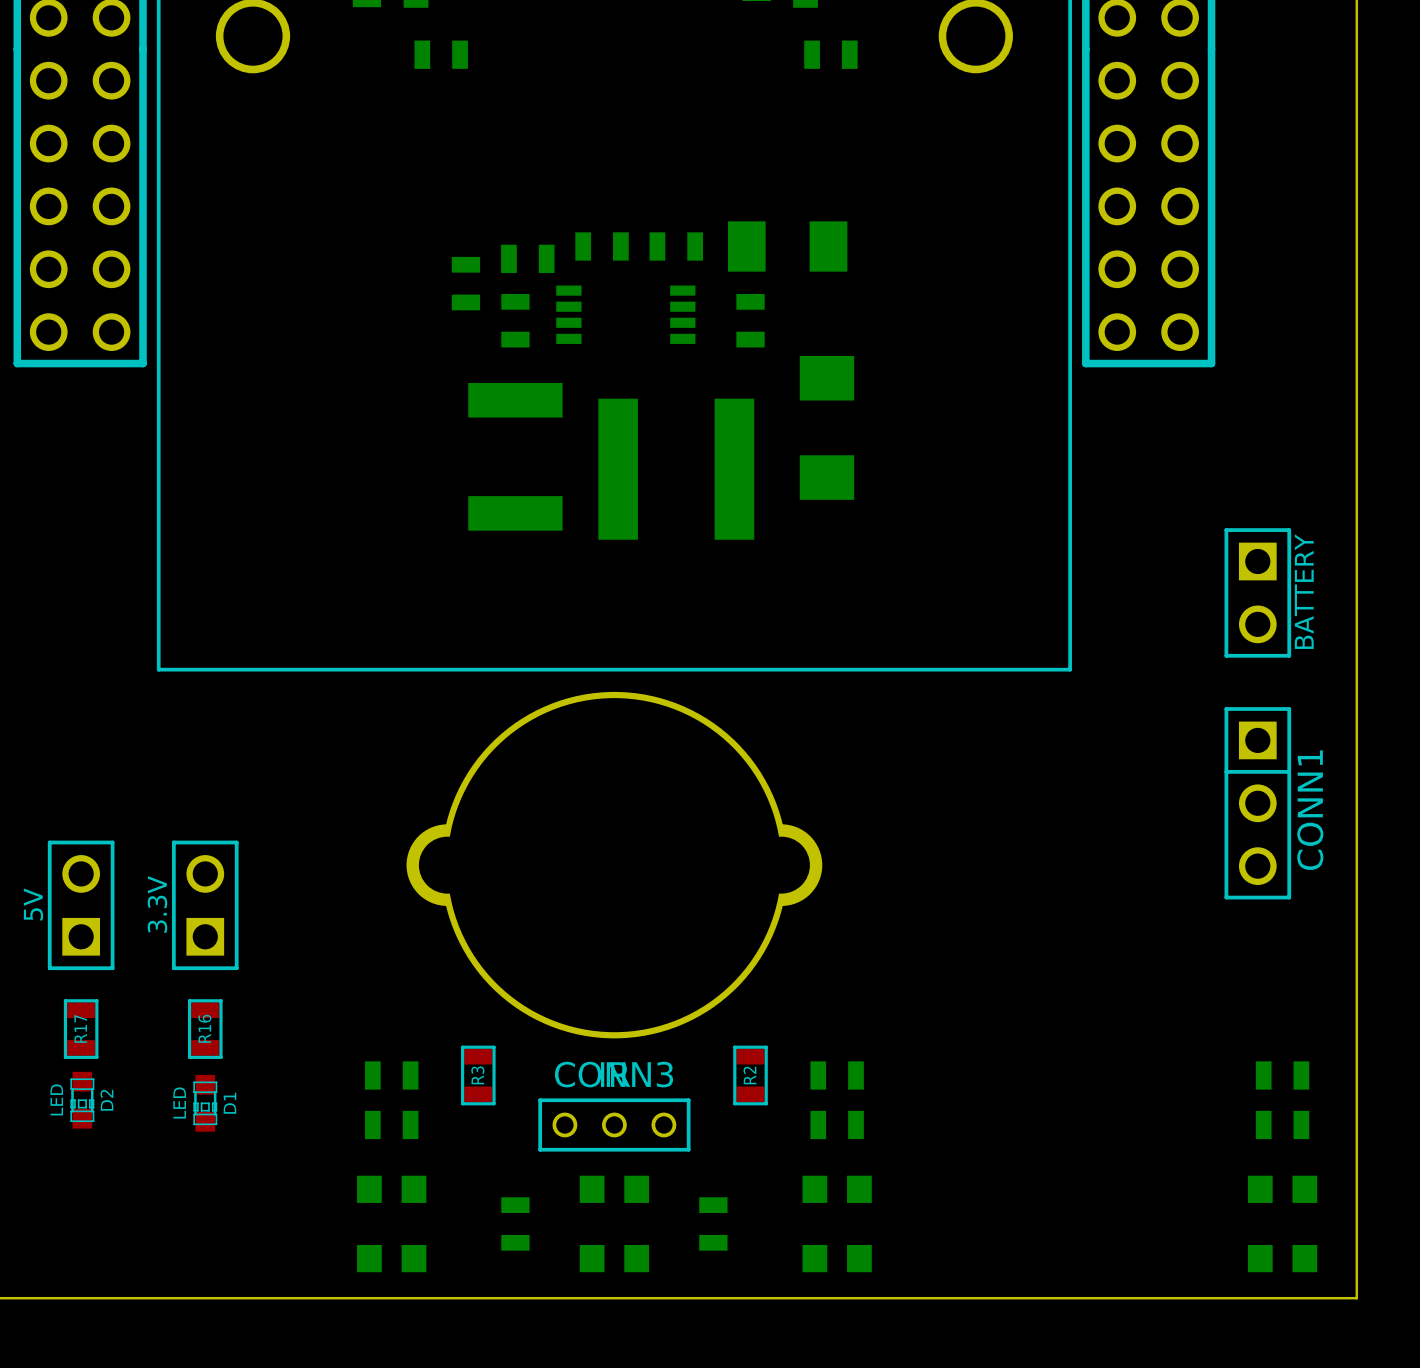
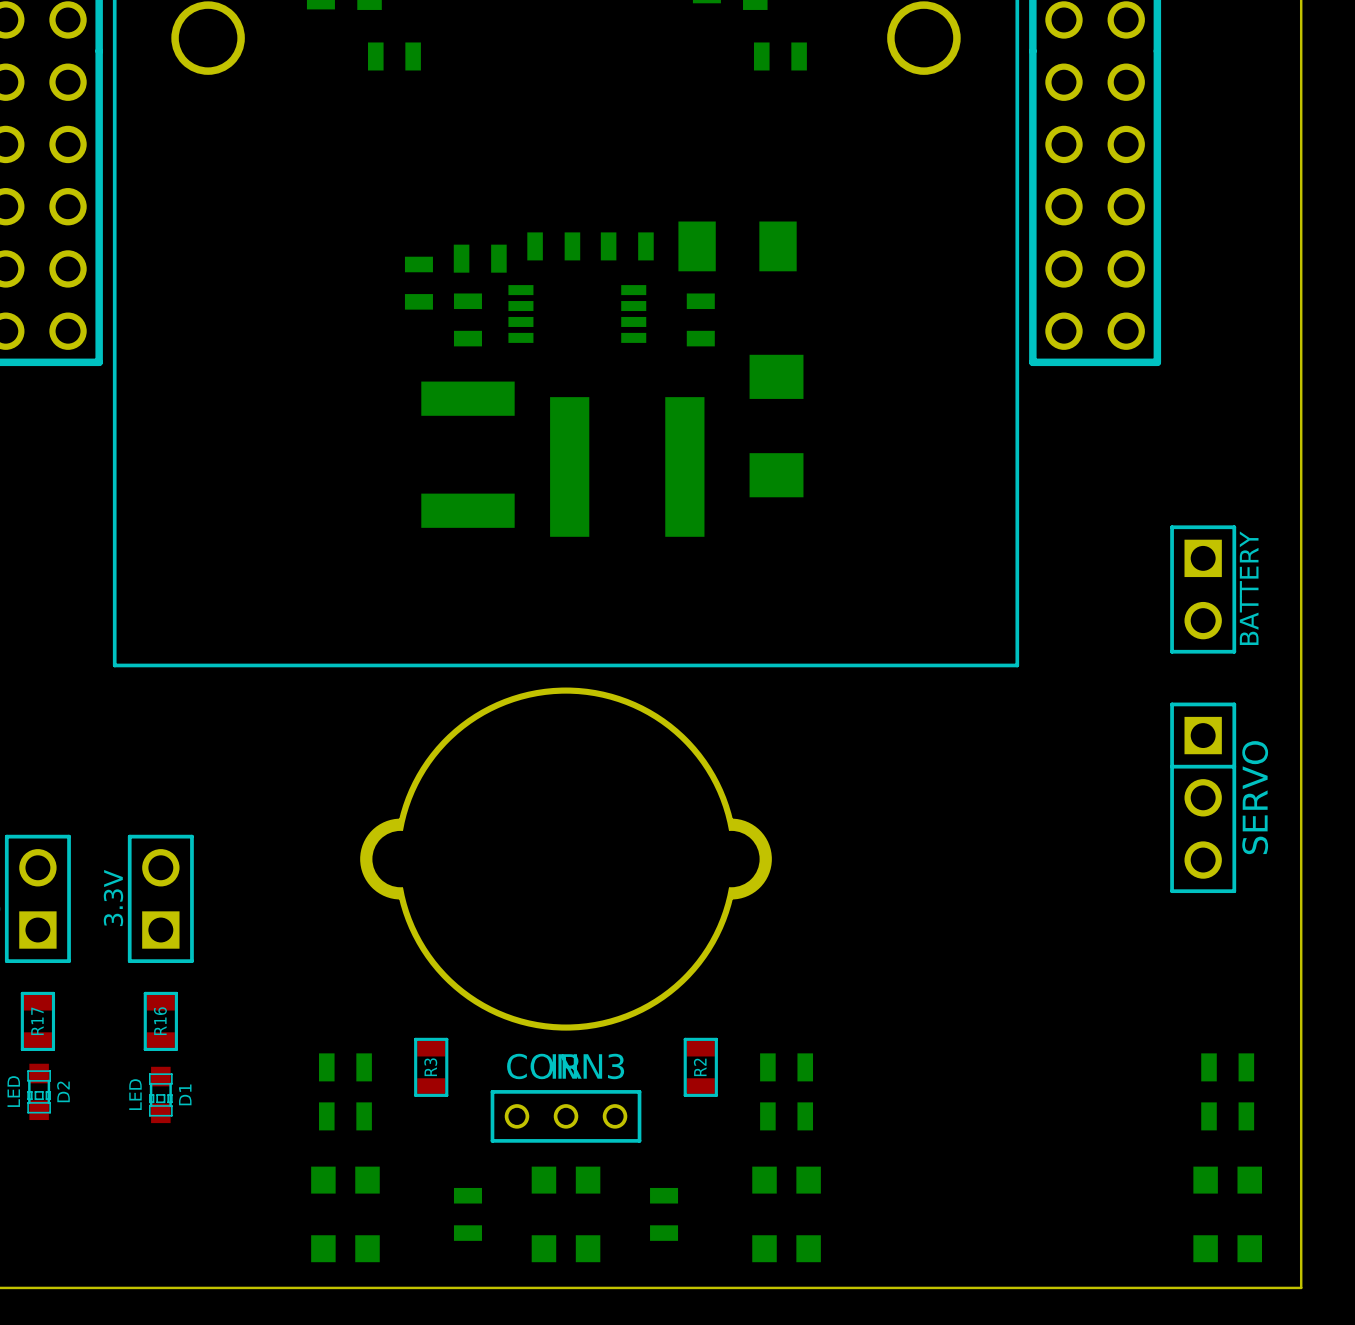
CONN1 value: none -> SERVO (1255, 797)
CONN1 name: CONN1 (1310, 810) -> none

